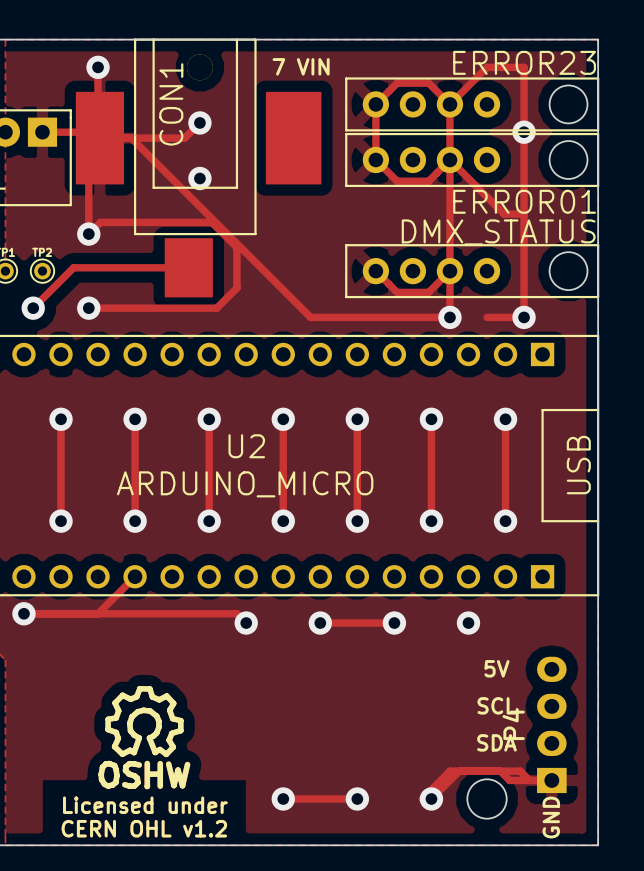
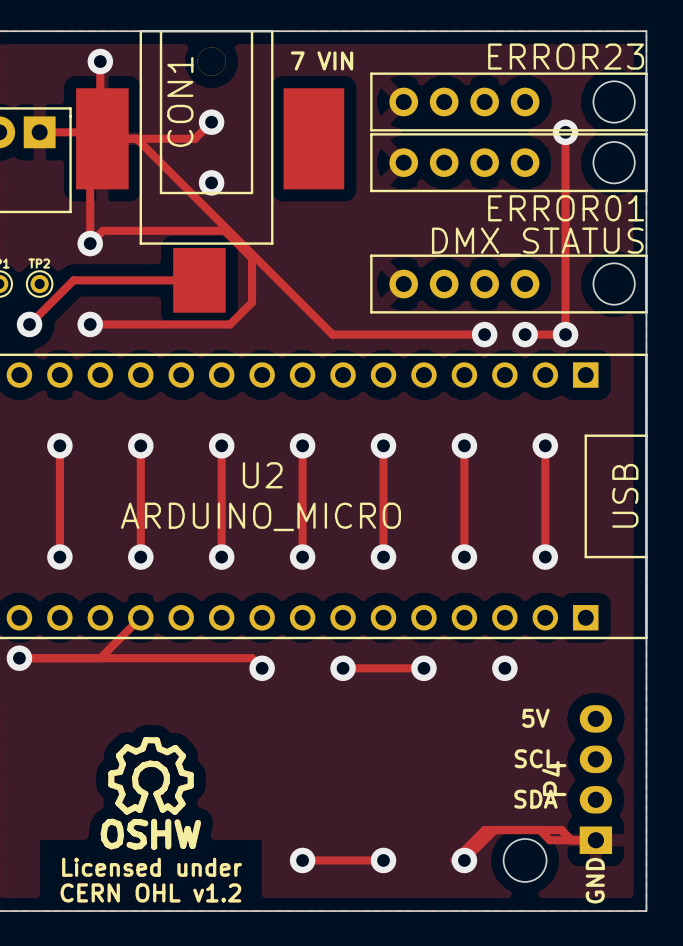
track: (449, 104) (449, 317) -> none
track: (449, 104) (428, 83) (397, 83) (375, 104) (375, 159) (397, 181) (428, 181) (449, 159) (504, 214) (524, 214) -> none
track: (449, 104) (487, 67) (524, 67) (524, 132) -> none
track: (375, 271) (397, 292) (428, 292) (449, 271) -> none
via: none -> (525, 334)

